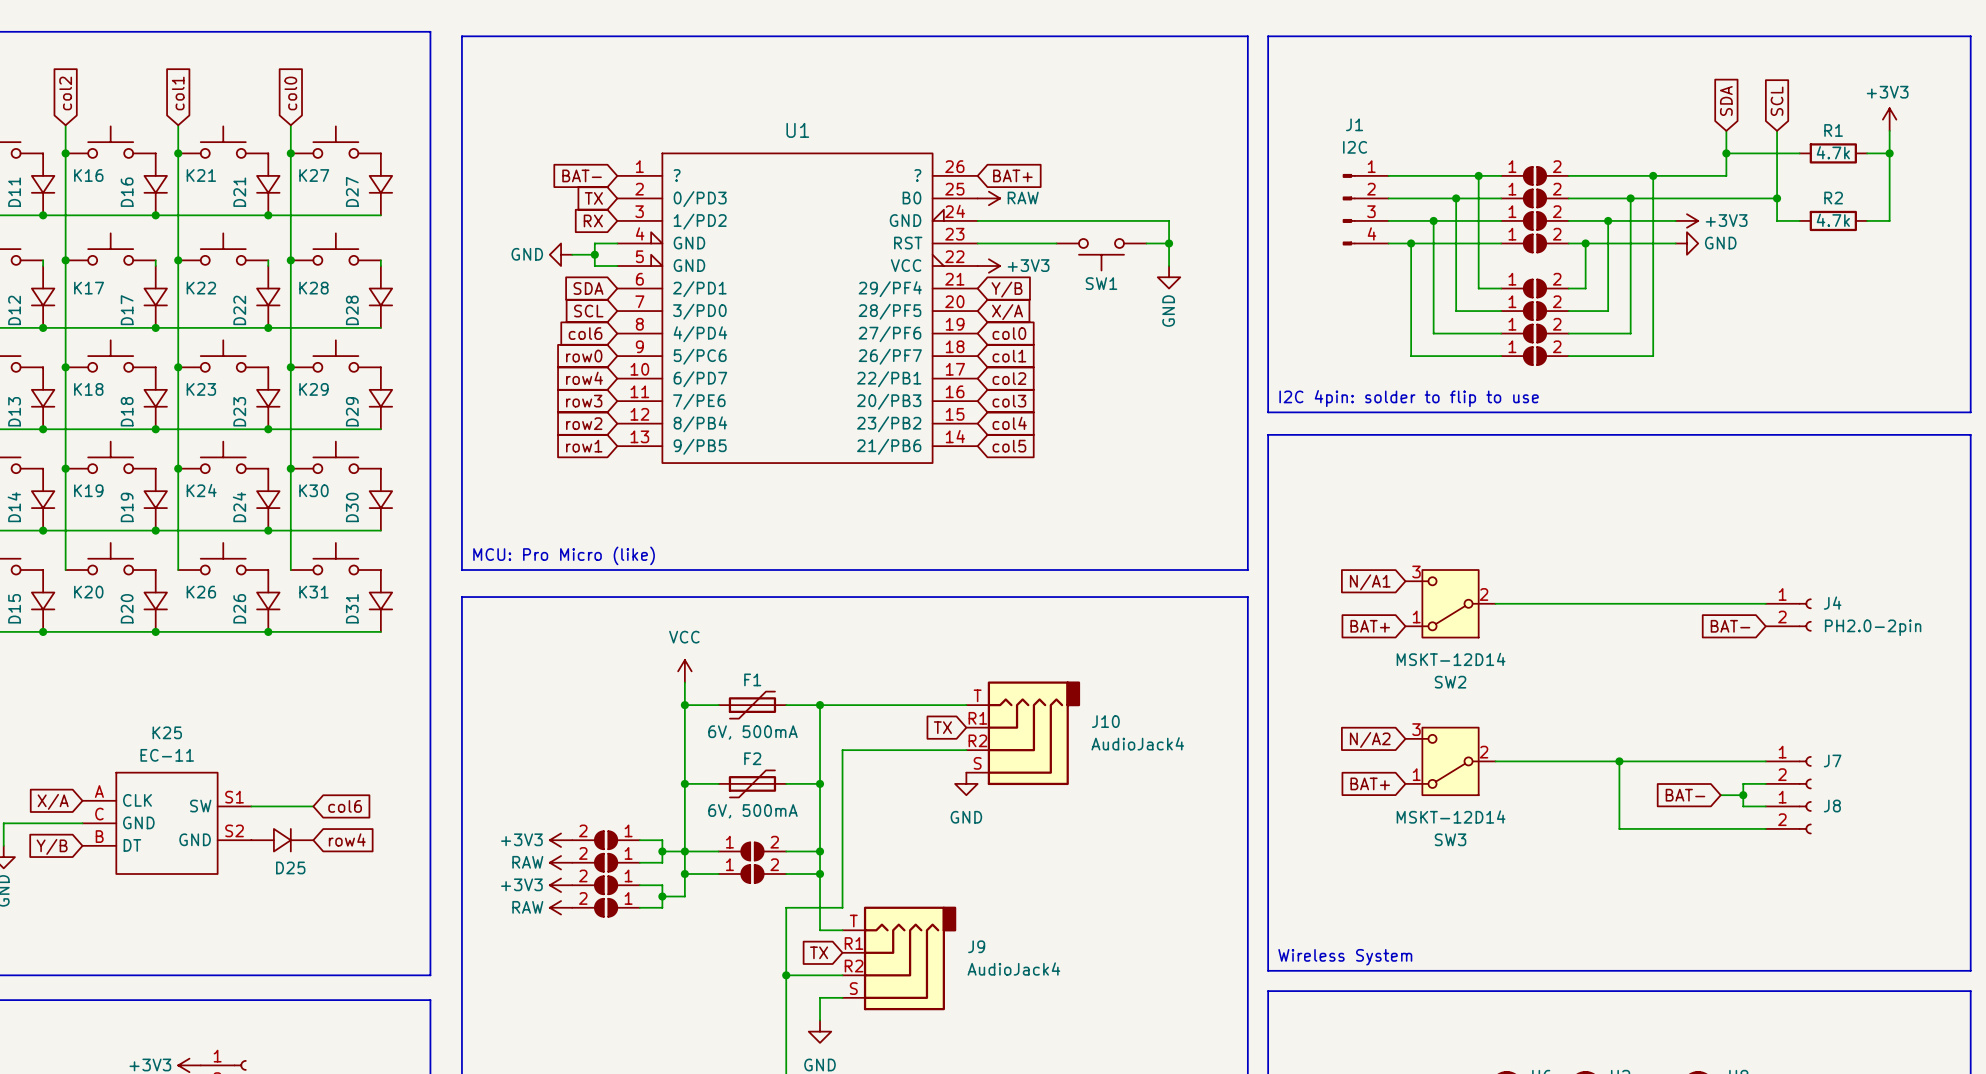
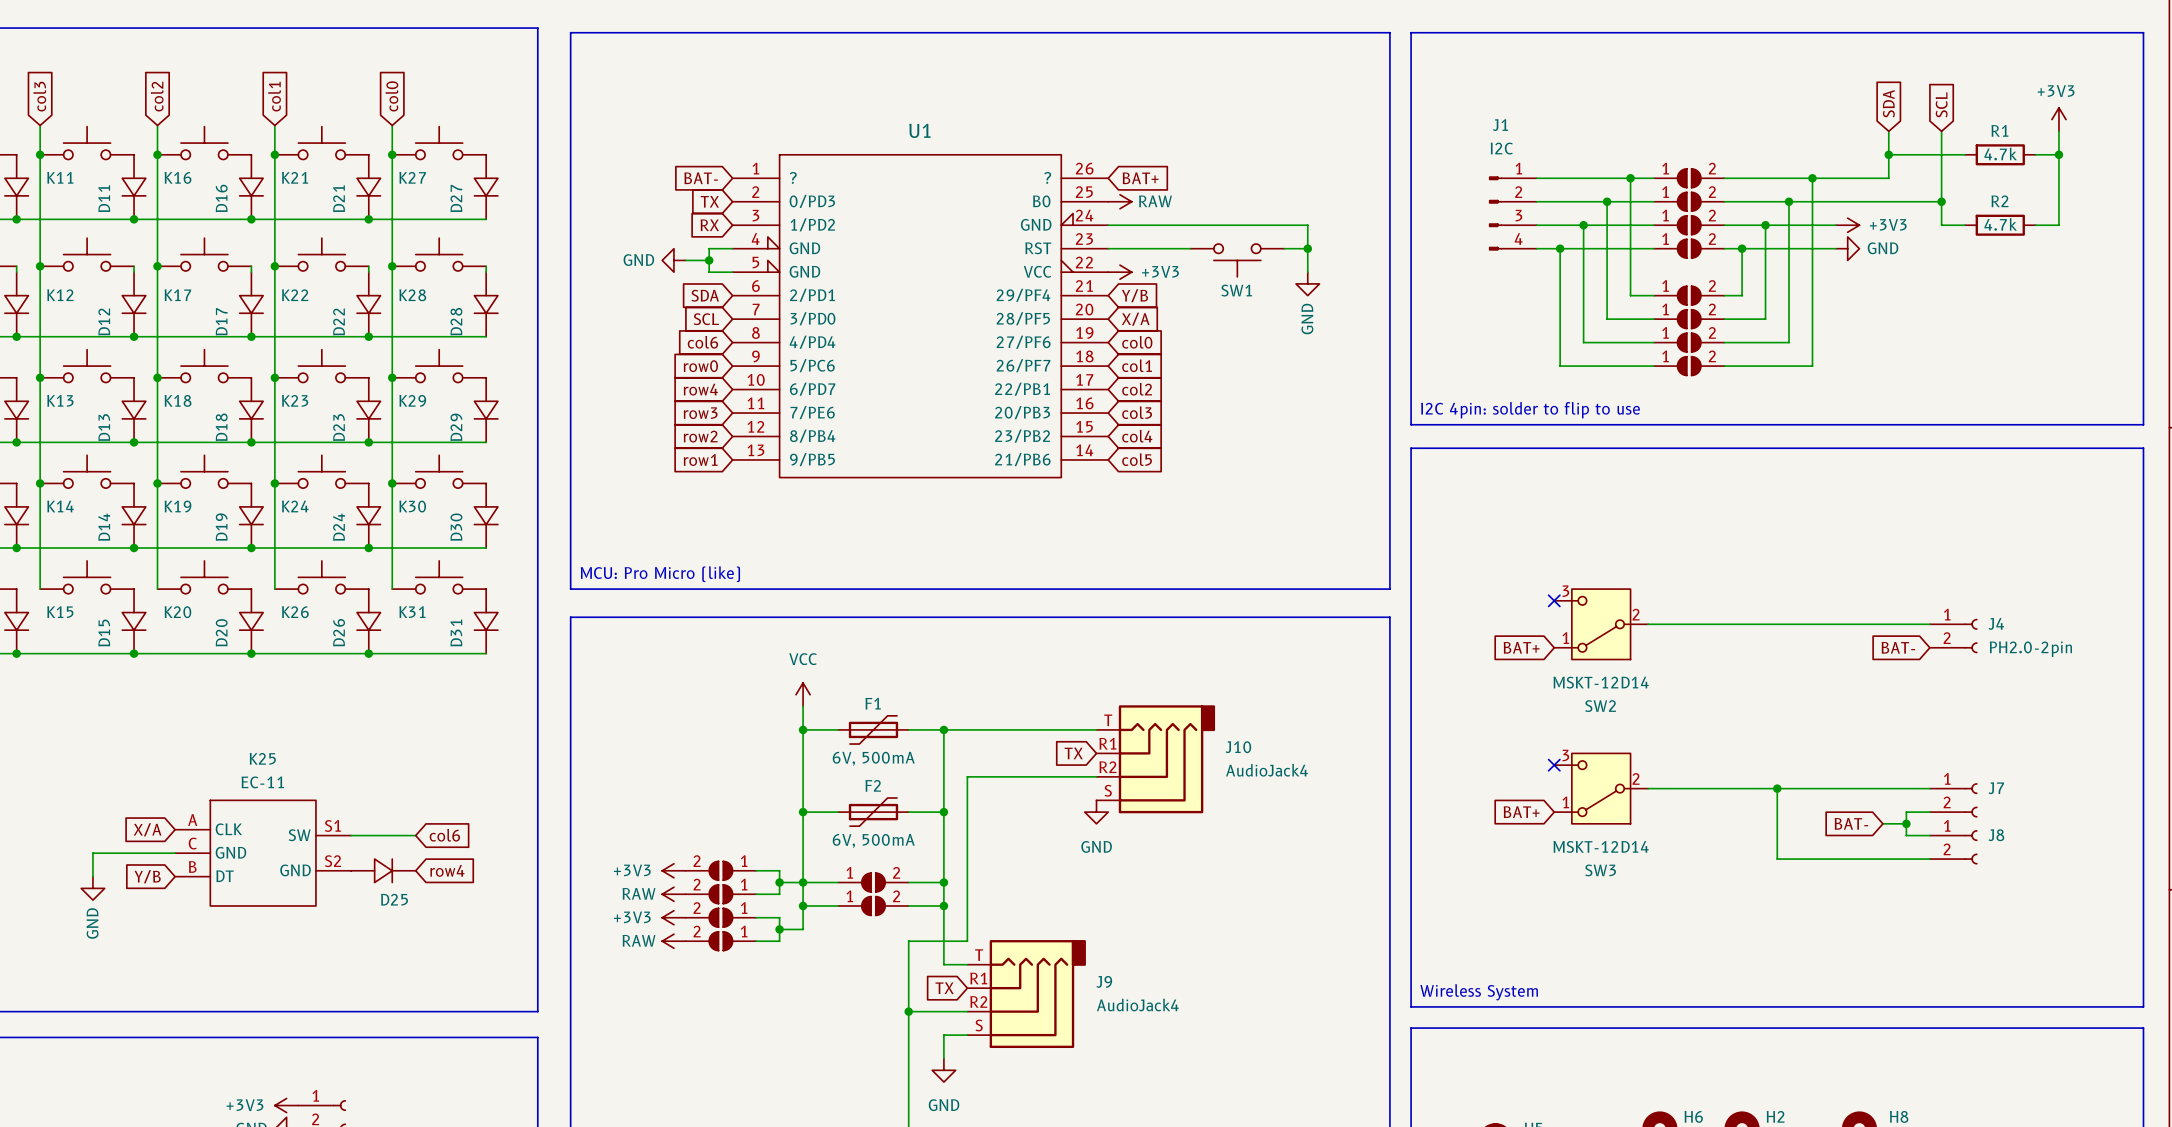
no-connect mark: none -> (1554, 600)
global label: N/A1 (1370, 582) -> none
no-connect mark: none -> (1554, 765)
global label: N/A2 (1370, 739) -> none

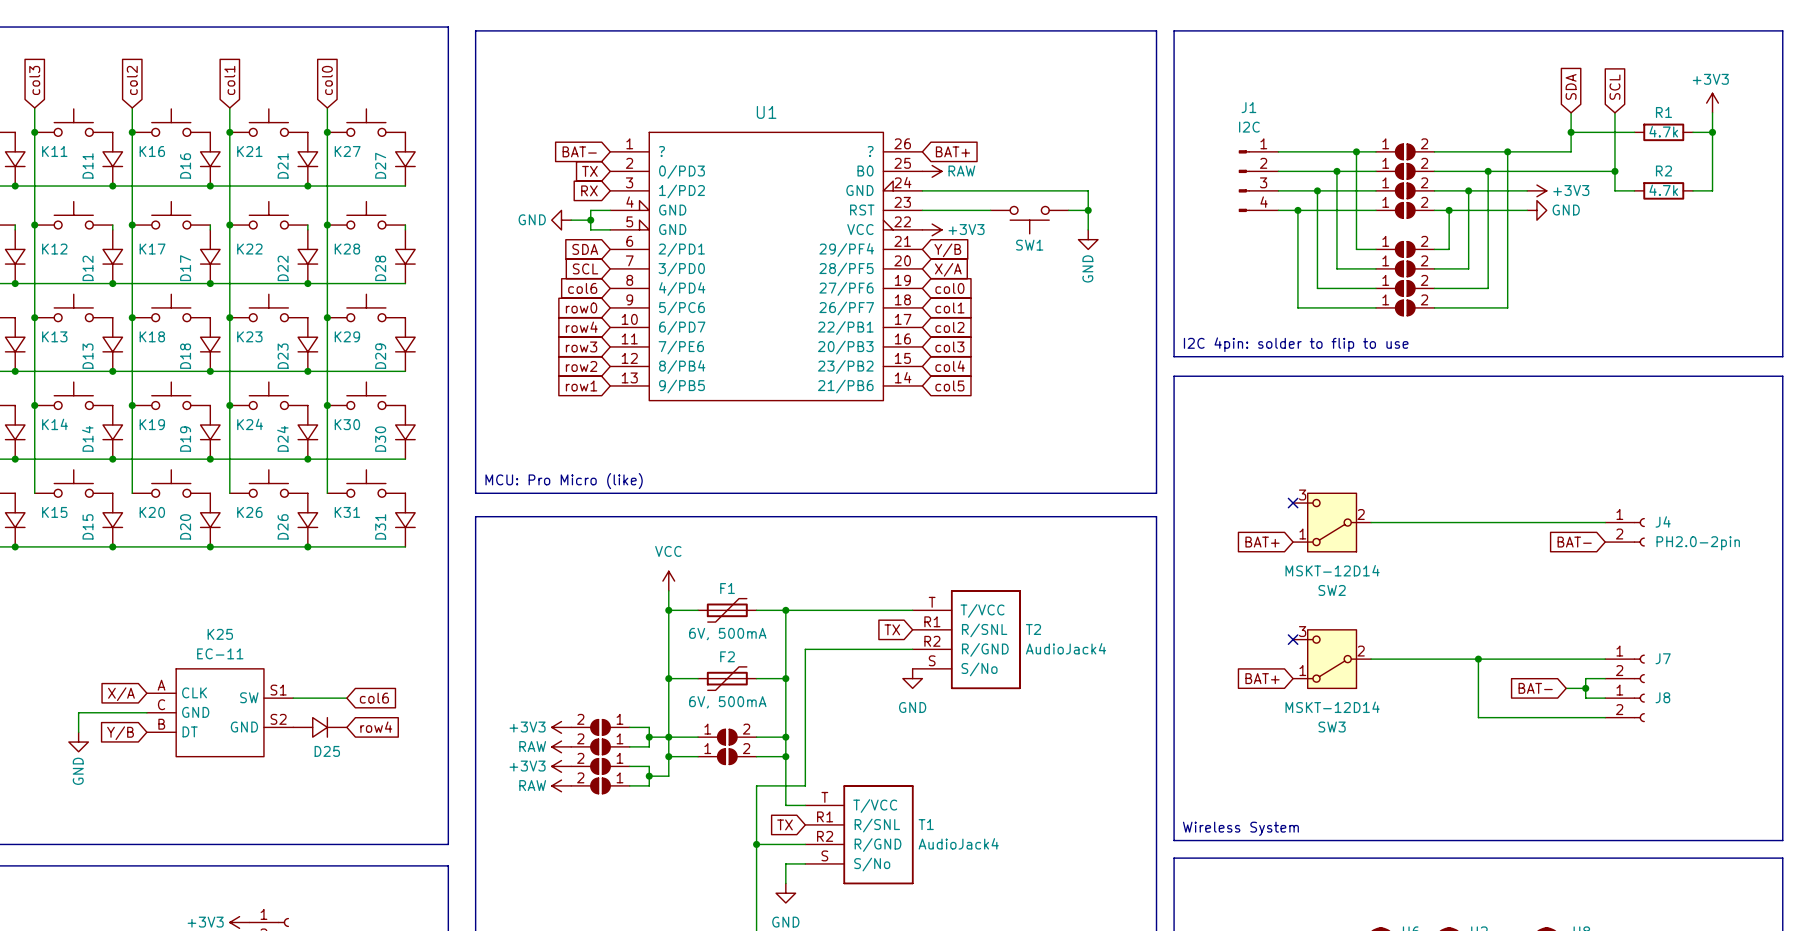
J10: AudioJack4 (1155, 759) -> none
T2: none -> AudioJack4 (966, 639)
J9: AudioJack4 (1026, 994) -> none
T1: none -> AudioJack4 (858, 834)

